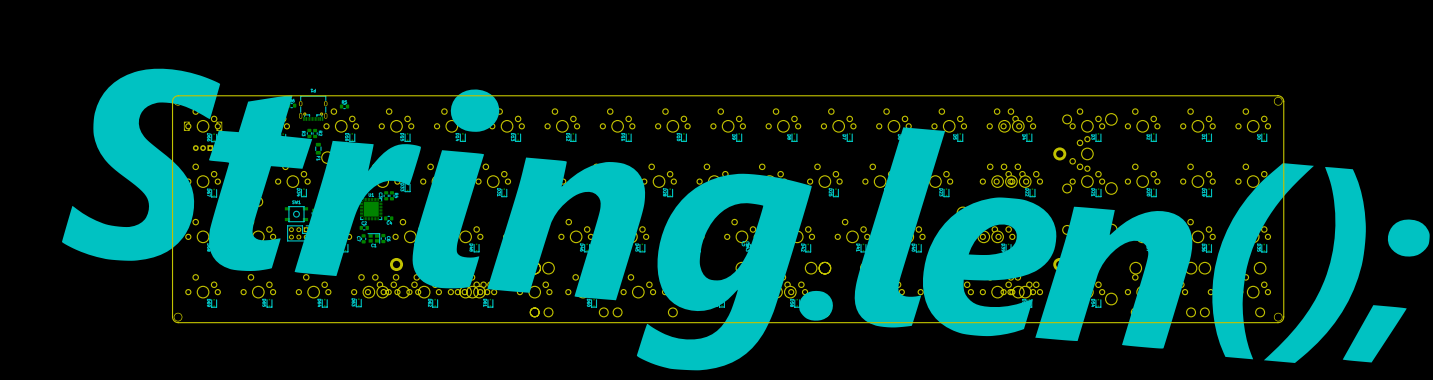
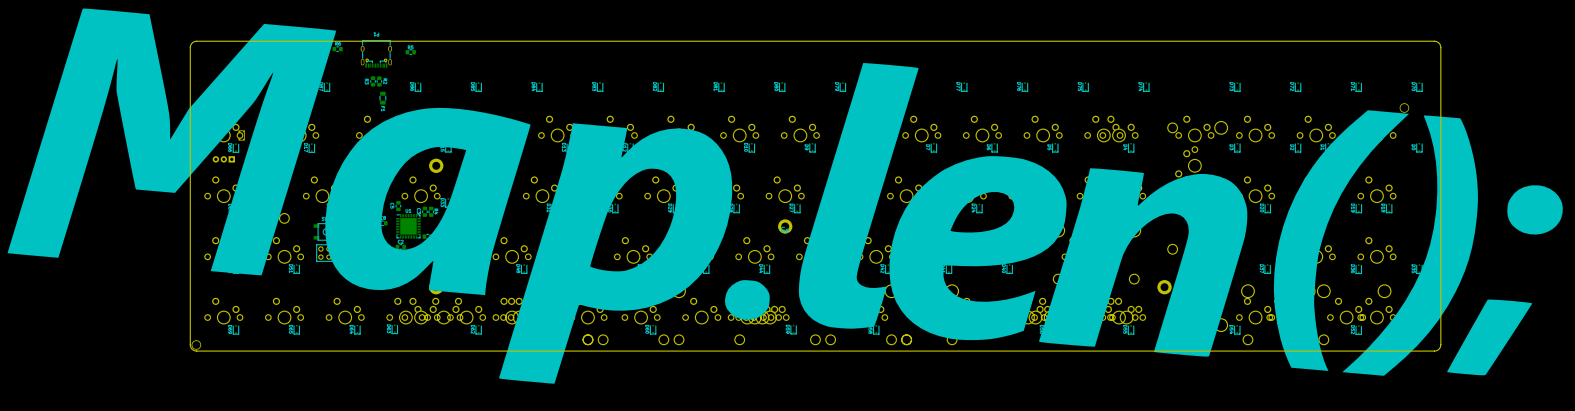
part: none -> (327, 86)
part: none -> (418, 86)
part: none -> (478, 86)
part: none -> (539, 86)
part: none -> (600, 86)
part: none -> (660, 86)
part: none -> (721, 86)
part: none -> (782, 86)
part: none -> (842, 86)
part: none -> (964, 86)
part: none -> (1024, 86)
part: none -> (1085, 86)
part: none -> (1146, 86)
part: none -> (1237, 86)
part: none -> (1298, 86)
part: none -> (1358, 86)
part: none -> (1419, 86)
board edge: (172, 101) (174, 97) (178, 95) (1279, 95) (1283, 101) (1283, 316) (1282, 320) (1277, 322) -> (190, 108) (190, 46) (192, 43) (196, 41) (1435, 41) (1440, 47) (1440, 345) (1435, 351) (1404, 351)
part position: (291, 105) -> (337, 49)
part position: (344, 106) -> (410, 52)
part position: (313, 108) -> (376, 53)
part position: (309, 133) -> (373, 81)
part position: (315, 133) -> (379, 81)
part position: (1098, 137) -> (1237, 147)
part position: (1153, 137) -> (1298, 147)
part position: (1264, 137) -> (1419, 147)
part position: (318, 148) -> (382, 98)
part: (1059, 153) -> none
part: none -> (785, 196)
part position: (1209, 192) -> (1358, 208)
part: (745, 219) -> none
part position: (1208, 247) -> (1358, 269)
part position: (1264, 247) -> (1419, 269)
part position: (1098, 303) -> (1237, 329)

